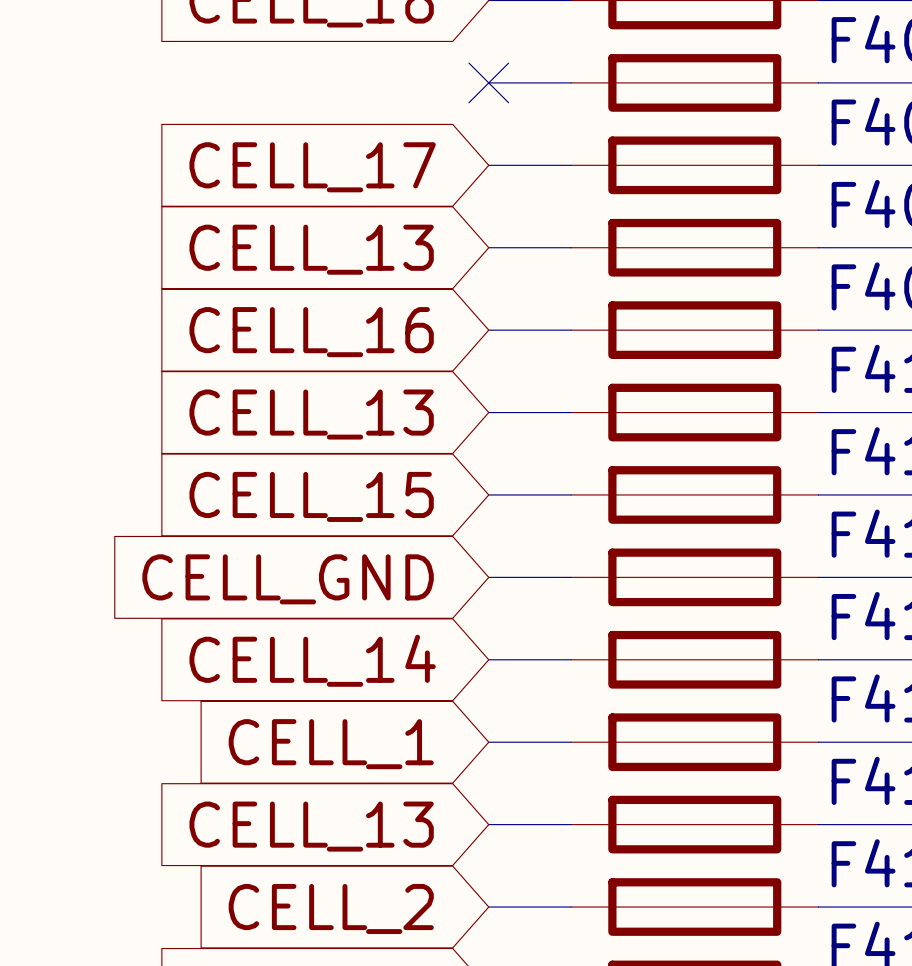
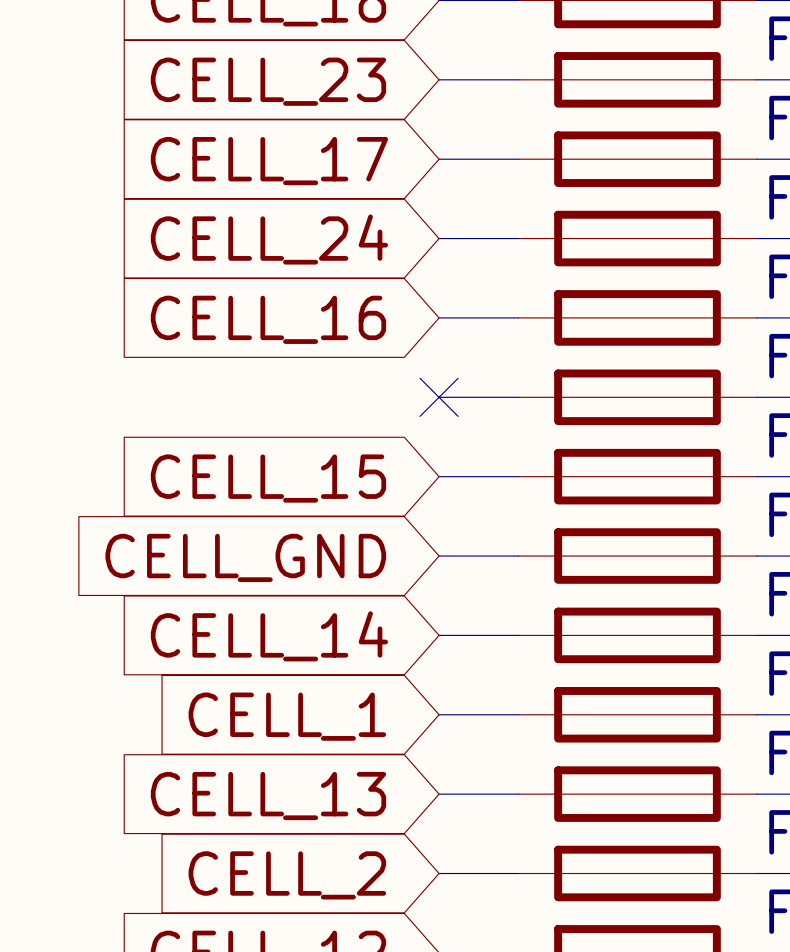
no-connect mark: (488, 82) -> none
global label: none -> CELL_23 (268, 81)
global label: CELL_13 (311, 249) -> CELL_24 (269, 239)
no-connect mark: none -> (439, 397)
global label: CELL_13 (311, 414) -> none

